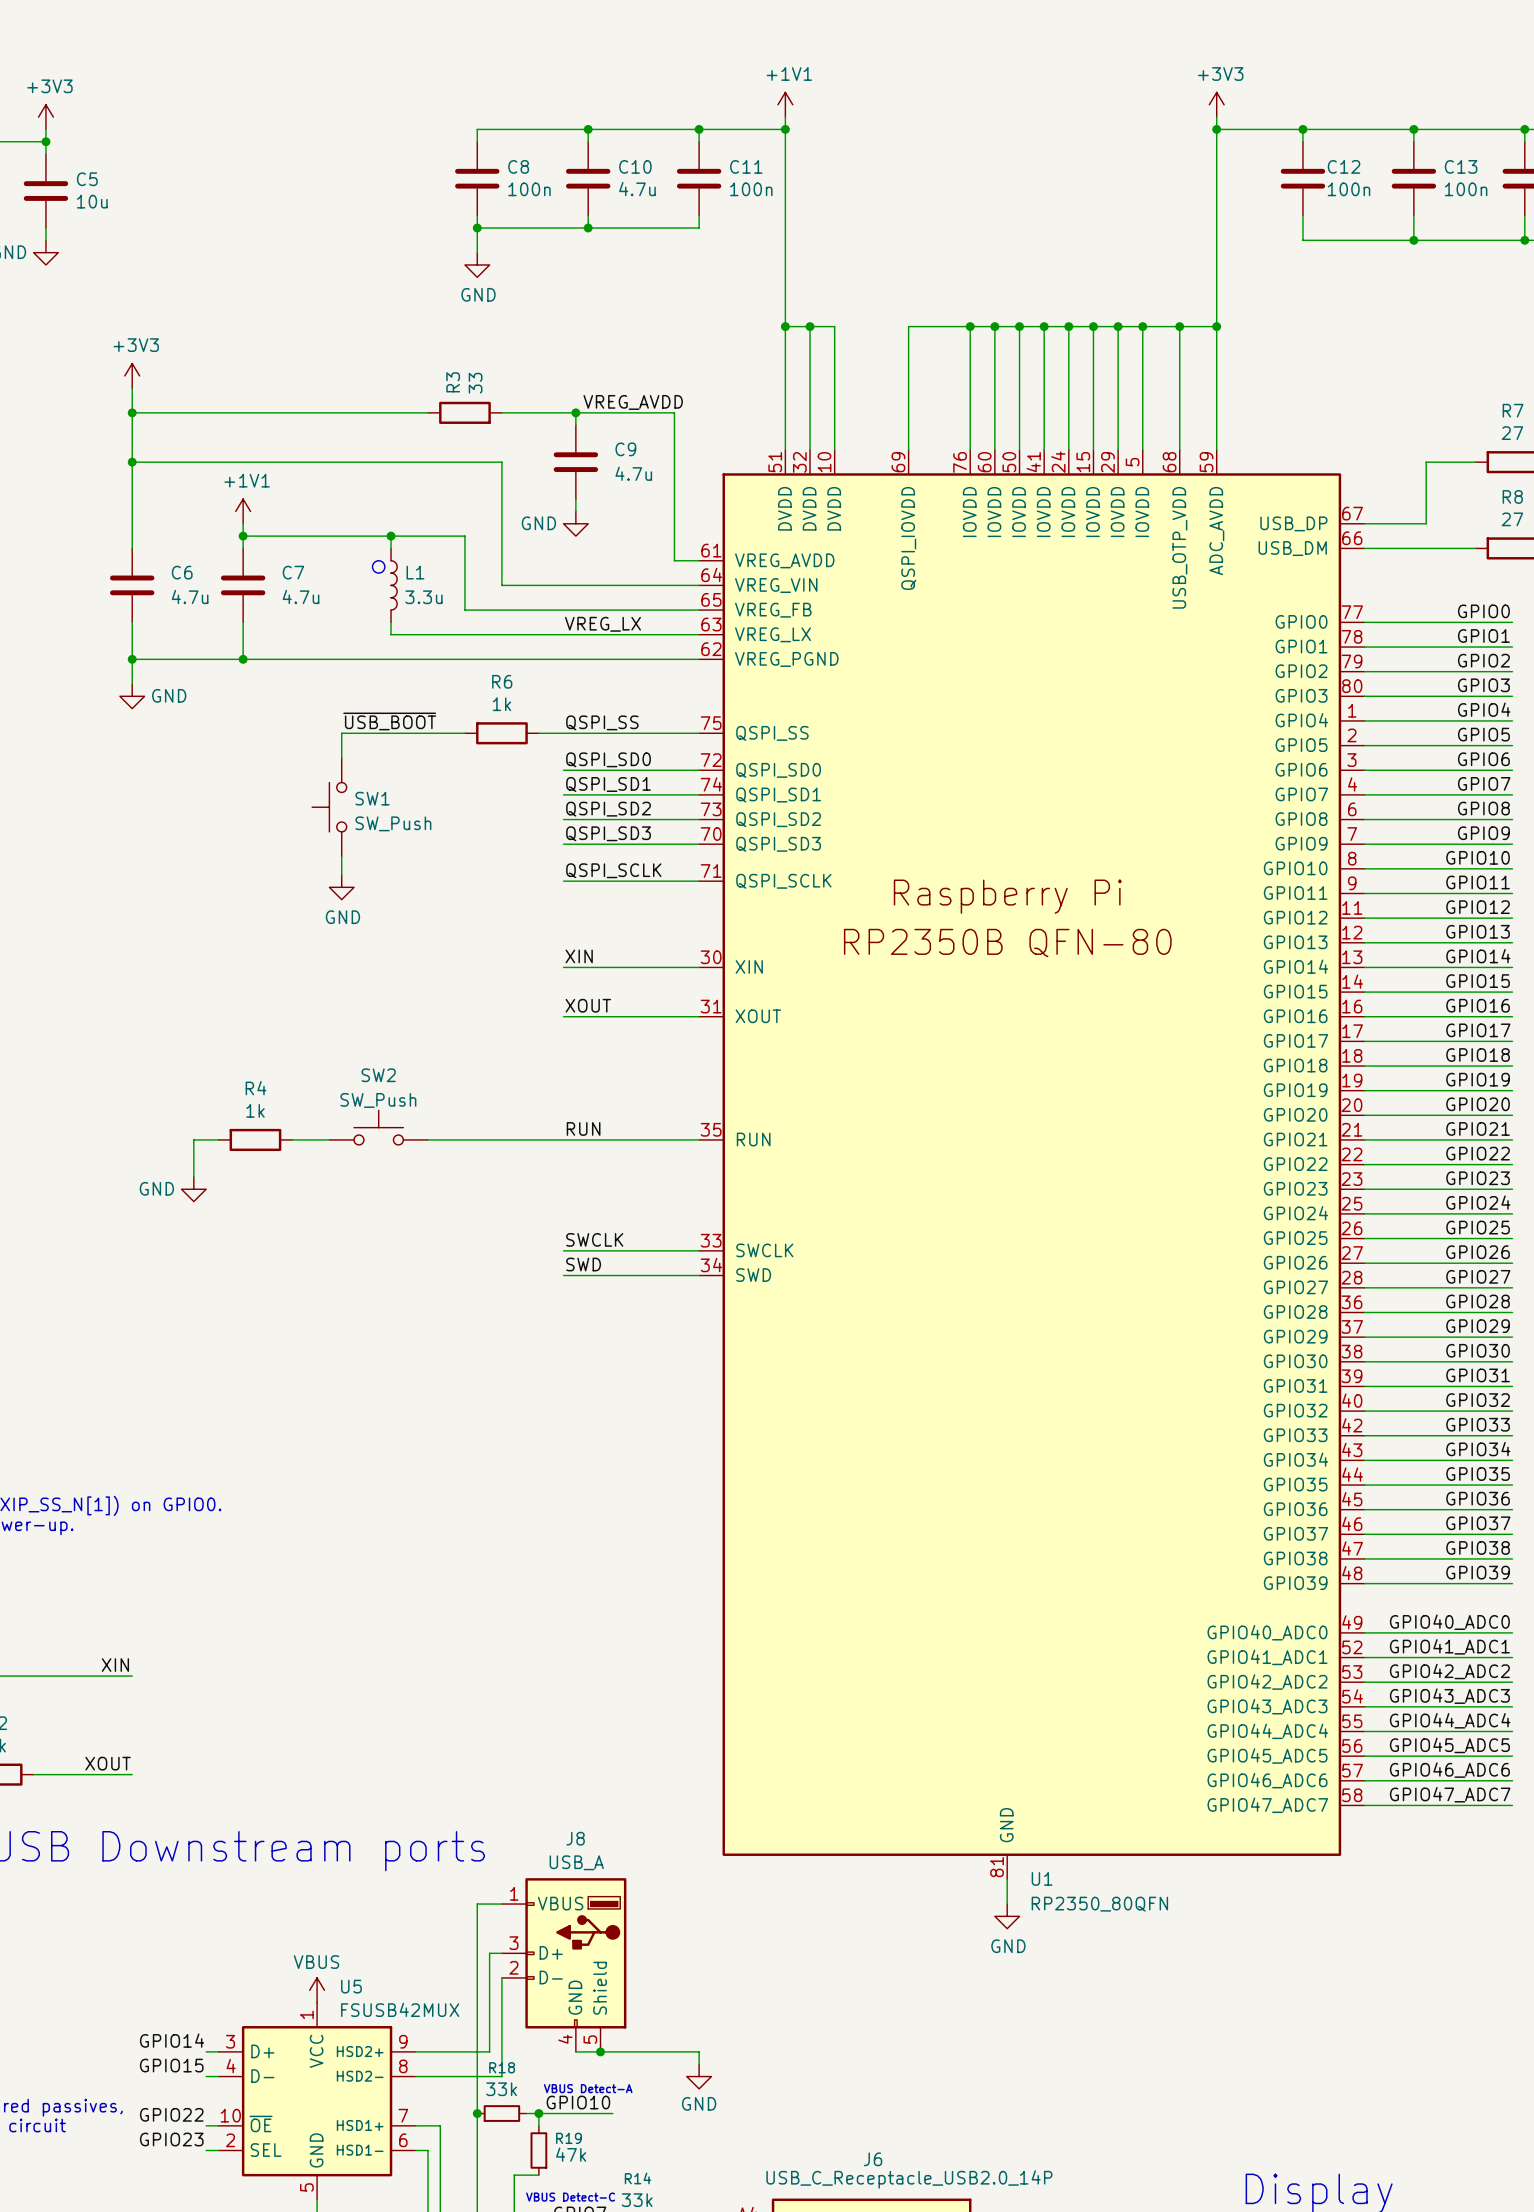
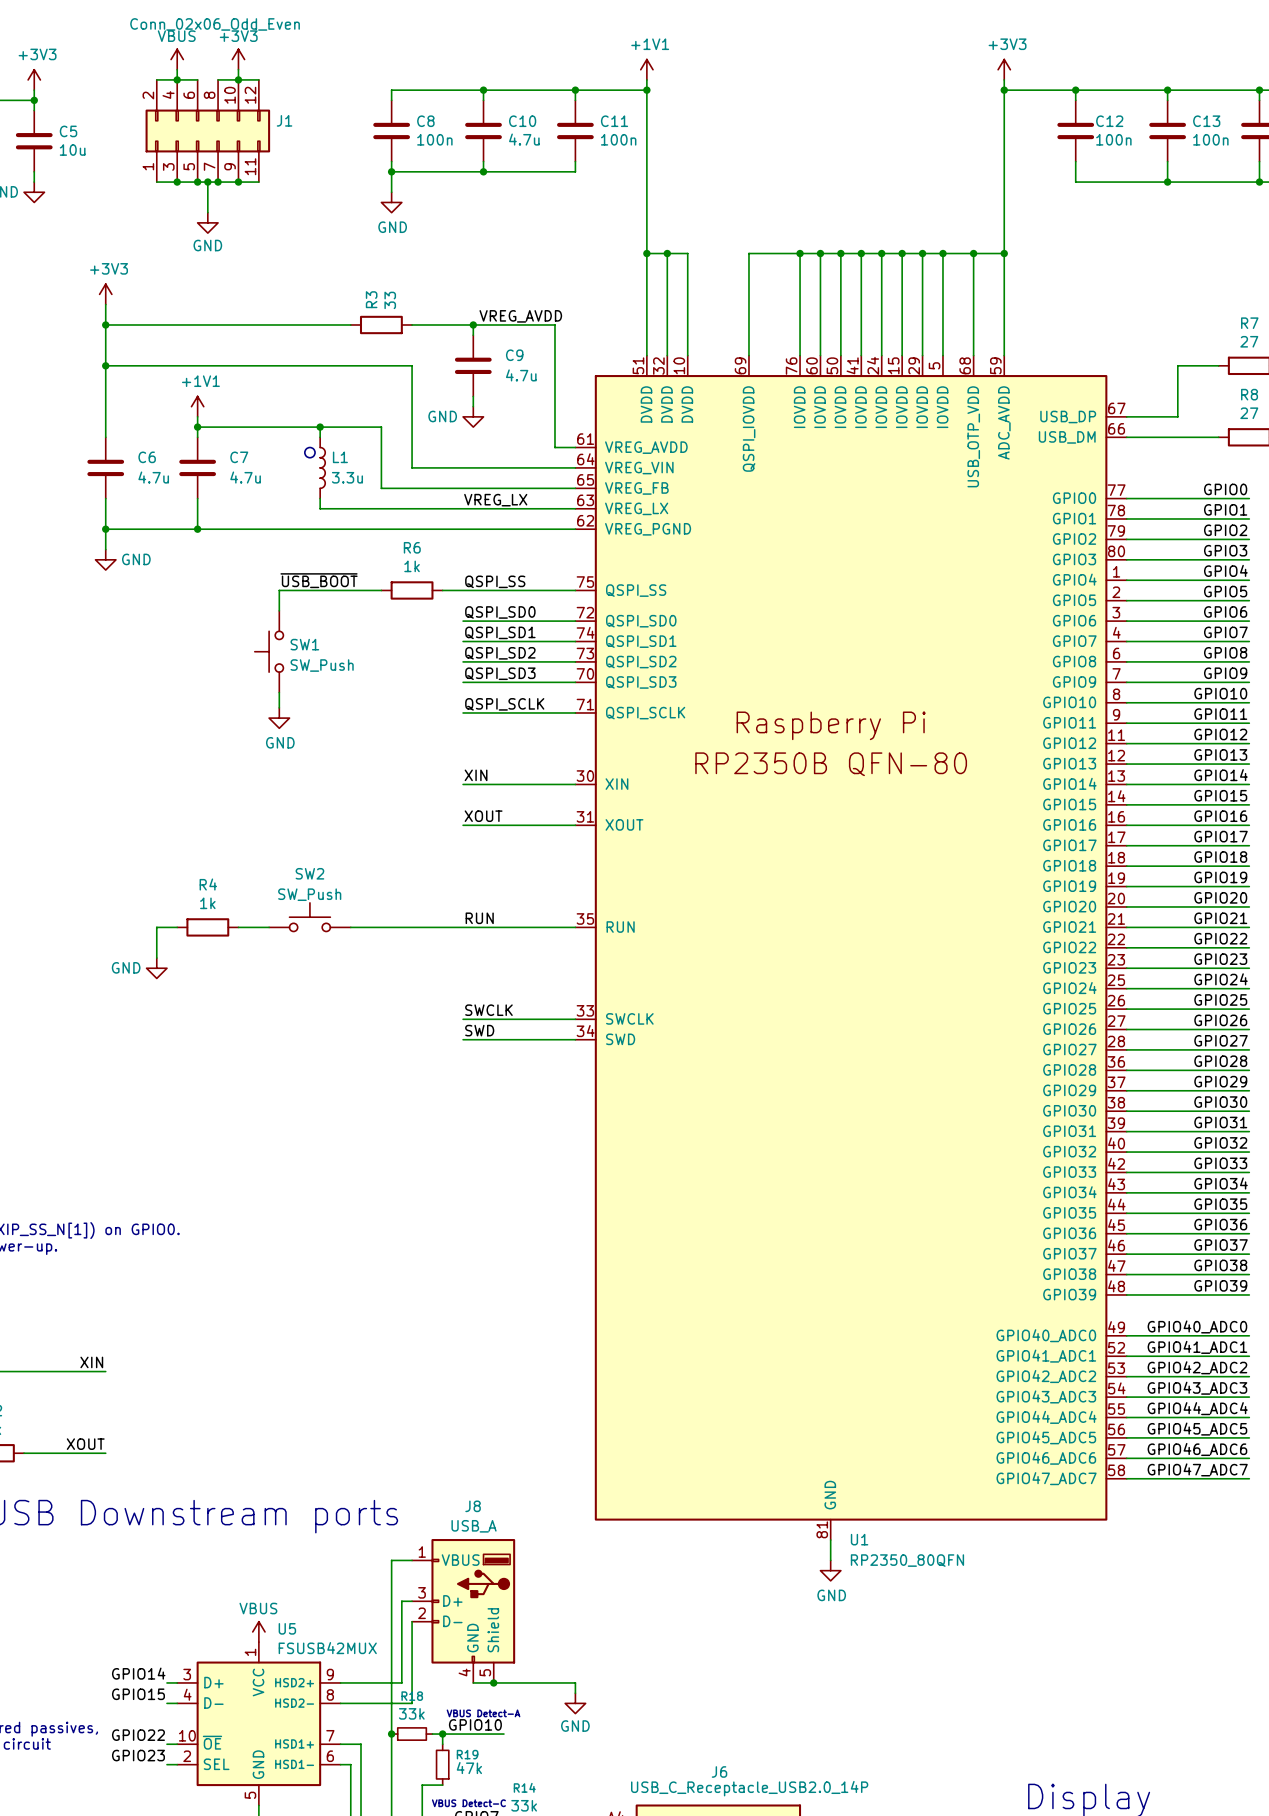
power symbol: none -> VBUS (177, 59)
power symbol: none -> +3V3 (238, 59)
wire: none -> (177, 69) (177, 79)
wire: none -> (238, 69) (238, 79)
wire: none -> (156, 79) (197, 79)
junction: none -> (177, 79)
wire: none -> (218, 79) (258, 79)
junction: none -> (238, 79)
J1: none -> Conn_02x06_Odd_Even (207, 130)
wire: none -> (156, 182) (258, 182)
junction: none -> (177, 182)
junction: none -> (197, 182)
wire: none -> (207, 182) (207, 212)
junction: none -> (207, 182)
junction: none -> (218, 182)
junction: none -> (238, 182)
power symbol: none -> GND (207, 222)

